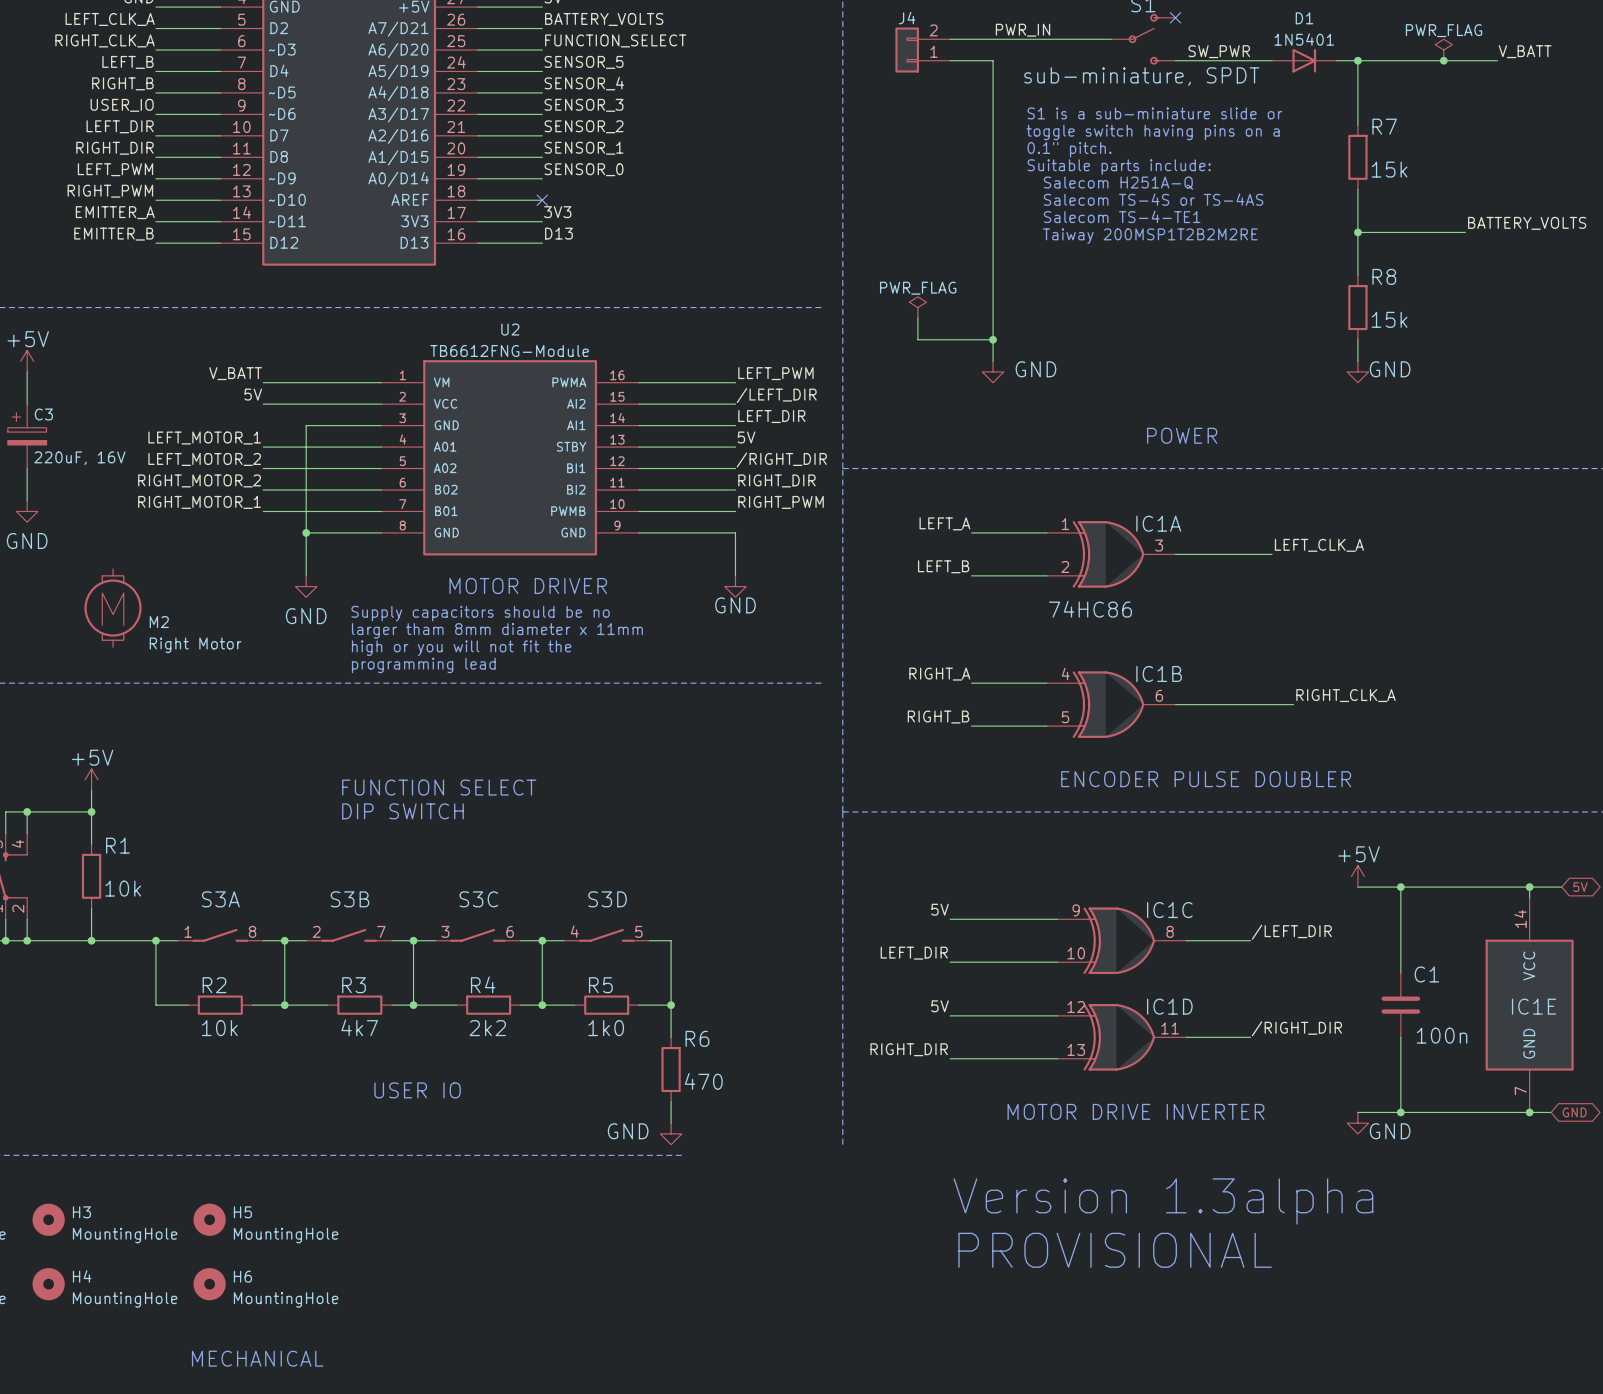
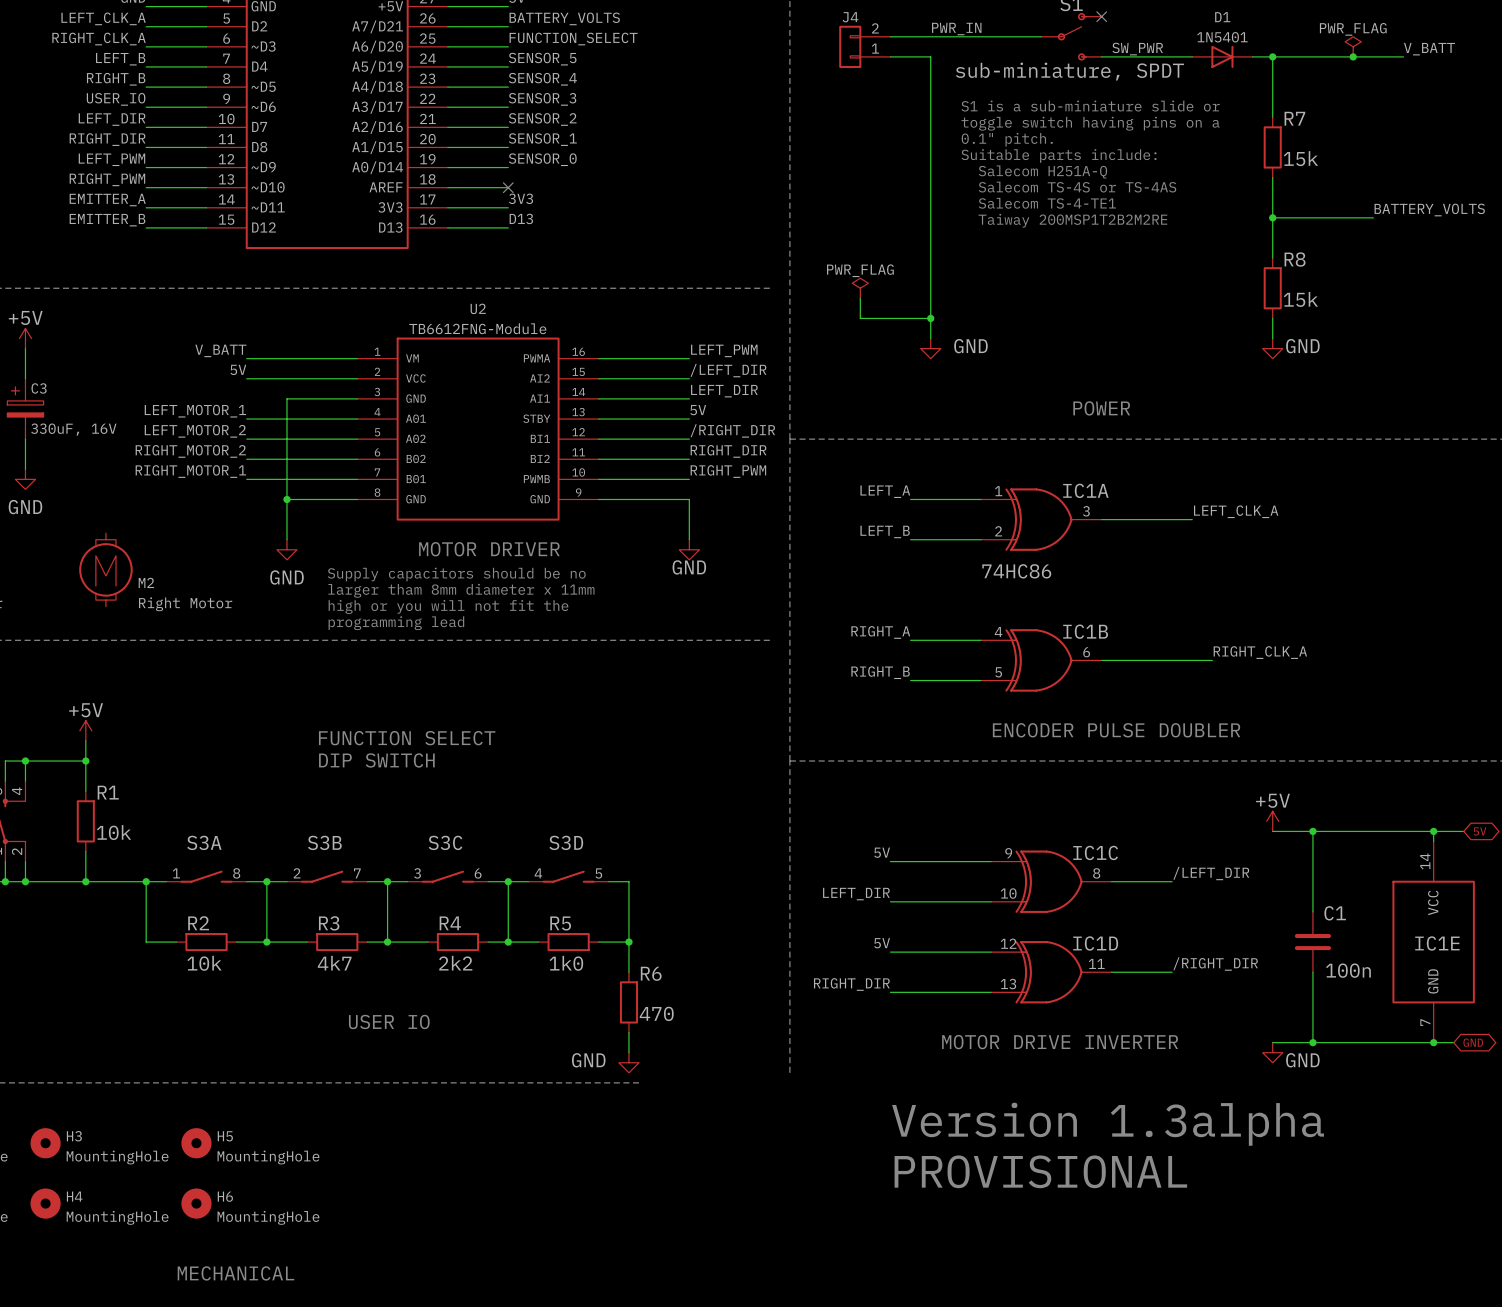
C3 value: 220uF, 16V (79, 458) -> 330uF, 16V (73, 429)

